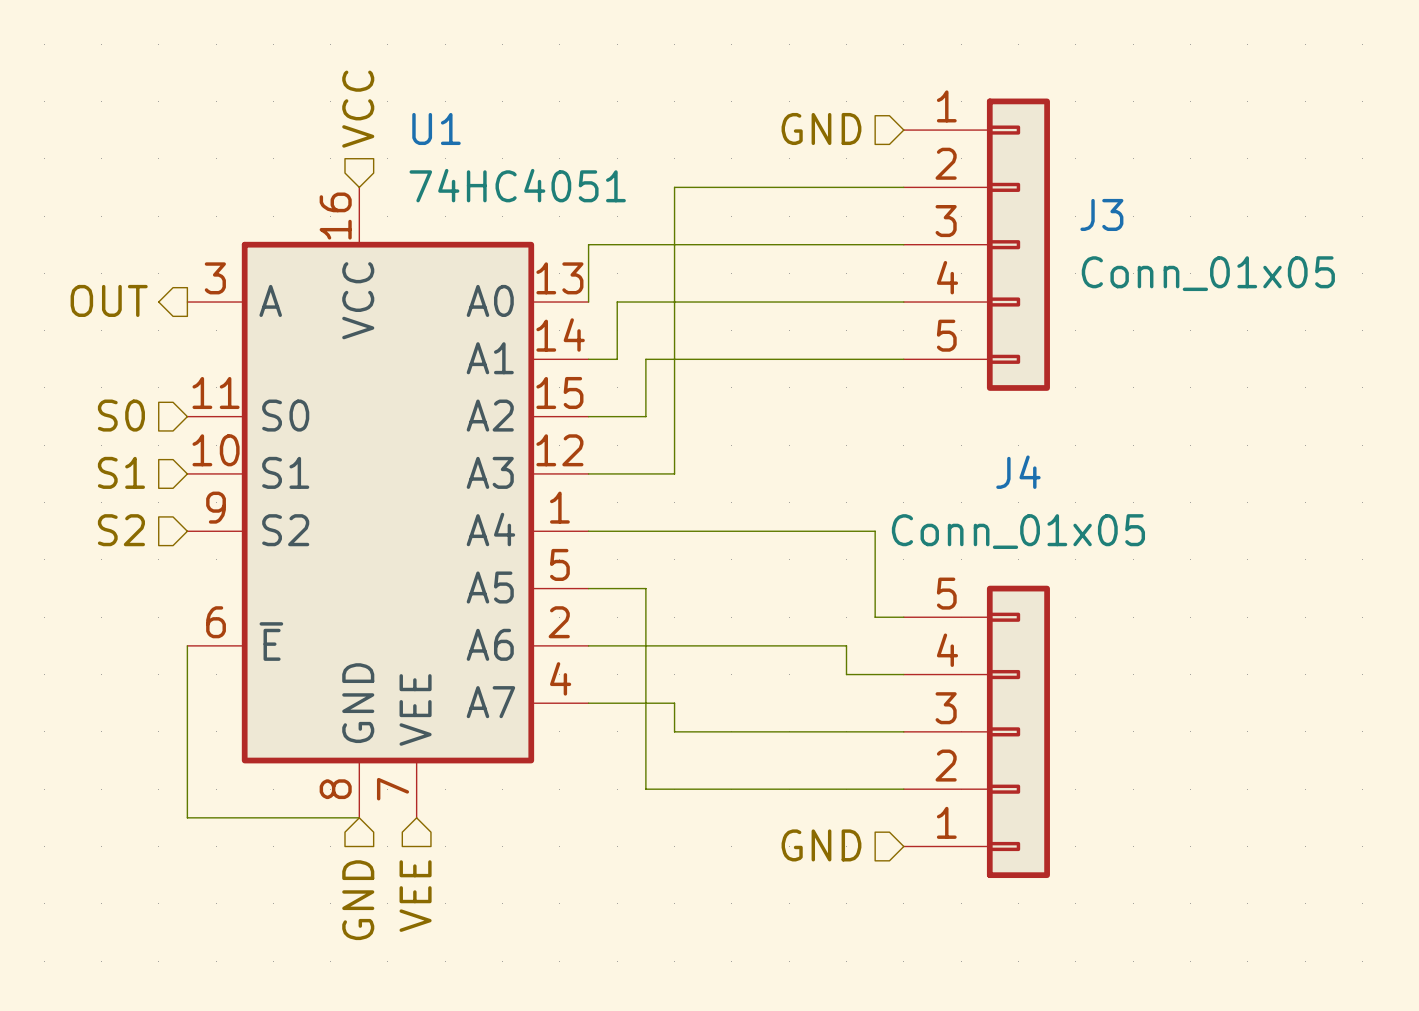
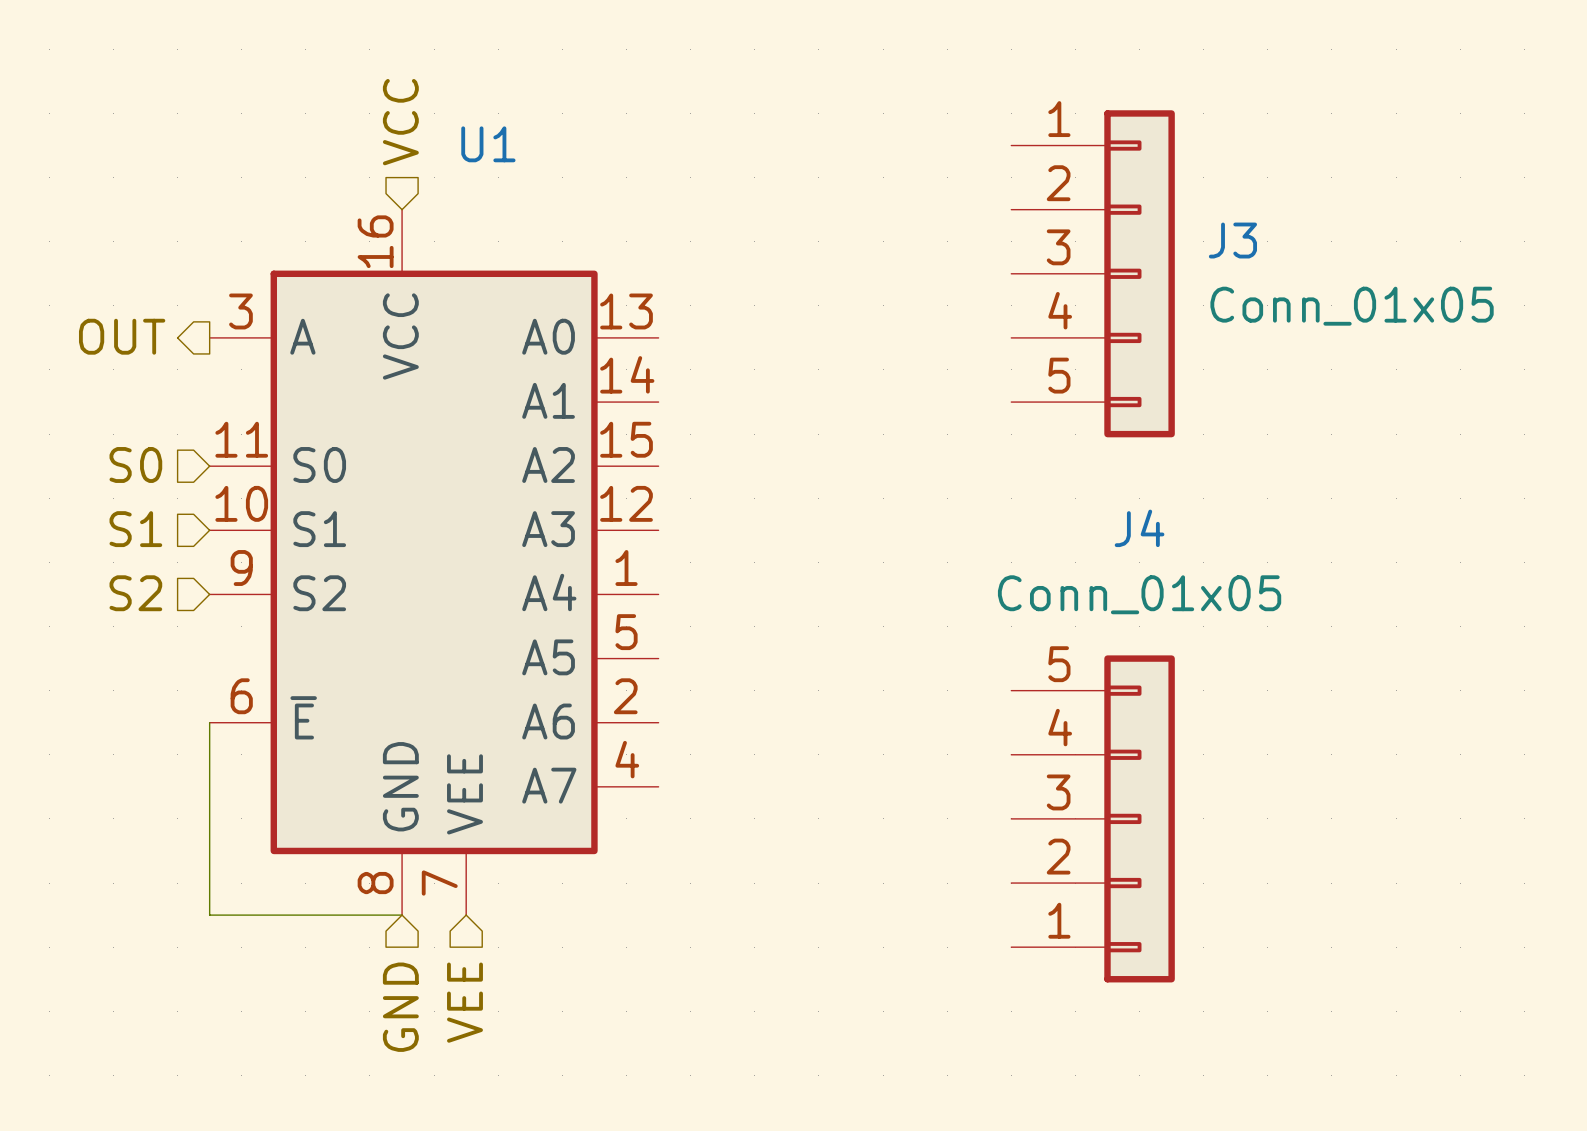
hierarchical label: GND (821, 128) -> none
U1 value: 74HC4051 (517, 185) -> none
wire: (903, 187) (674, 187) (674, 473) (588, 473) -> none
wire: (903, 244) (588, 244) (588, 302) -> none
wire: (903, 302) (617, 302) (617, 359) (588, 359) -> none
wire: (903, 359) (645, 359) (645, 416) (588, 416) -> none
wire: (588, 531) (875, 531) (875, 617) (903, 617) -> none
wire: (588, 588) (645, 588) (645, 789) (903, 789) -> none
wire: (588, 645) (846, 645) (846, 674) (903, 674) -> none
wire: (588, 703) (674, 703) (674, 731) (903, 731) -> none
hierarchical label: GND (821, 845) -> none

